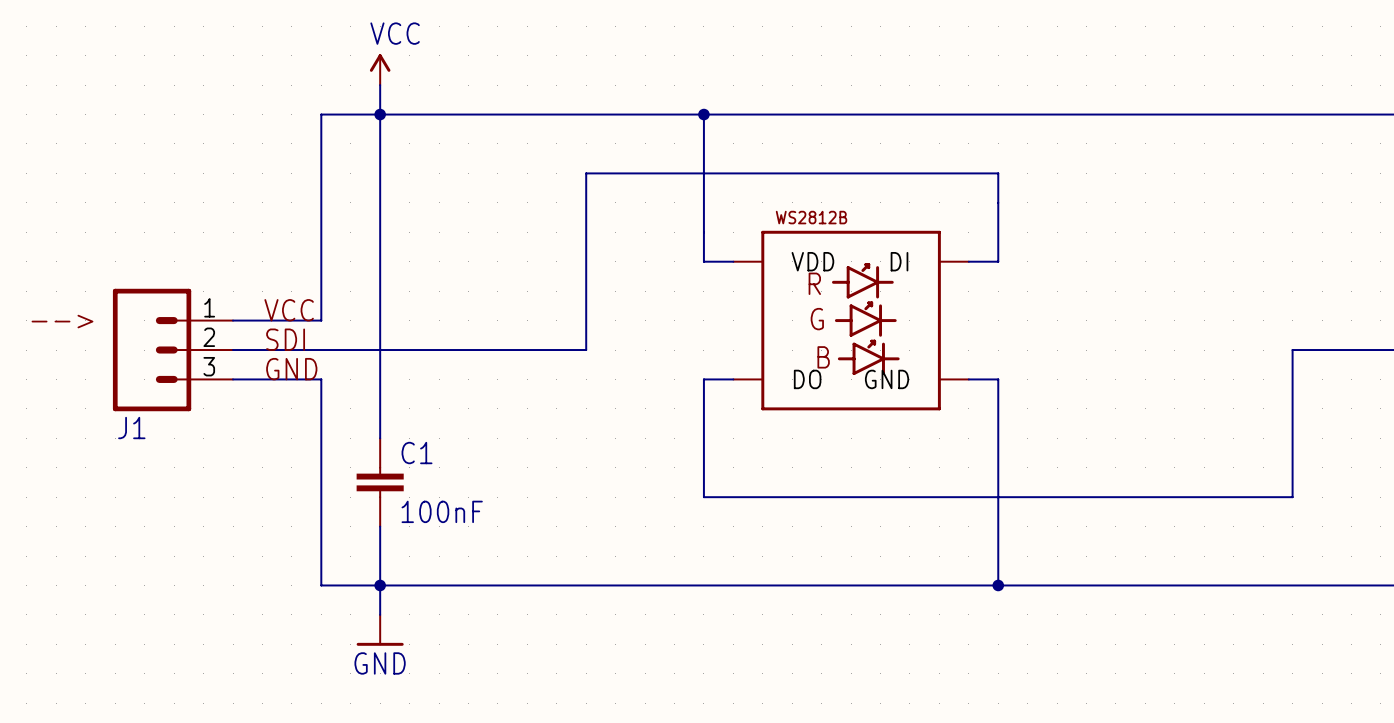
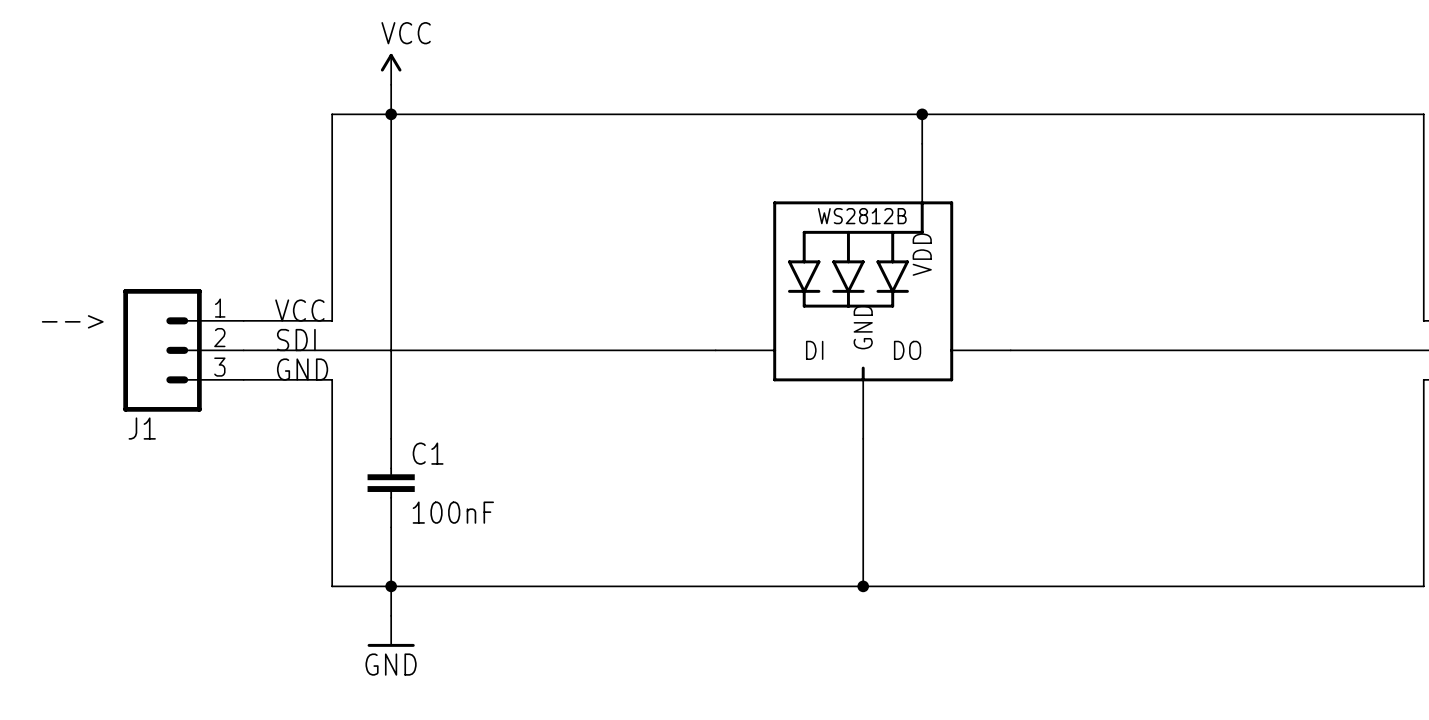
wire: (703, 114) (703, 261) (733, 261) -> none
junction: (703, 114) -> none
wire: none -> (922, 114) (922, 143)
junction: none -> (922, 114)
wire: (968, 261) (998, 261) (998, 173) (586, 173) (586, 350) -> (715, 350) (597, 350)
part: none -> (863, 291)
part: (851, 320) -> none
wire: (1292, 350) (1292, 497) (703, 497) (703, 379) (733, 379) -> (1305, 350) (1010, 350)
wire: (968, 379) (998, 379) (998, 585) -> none
wire: none -> (863, 438) (863, 586)
junction: none -> (863, 586)
junction: (998, 585) -> none

